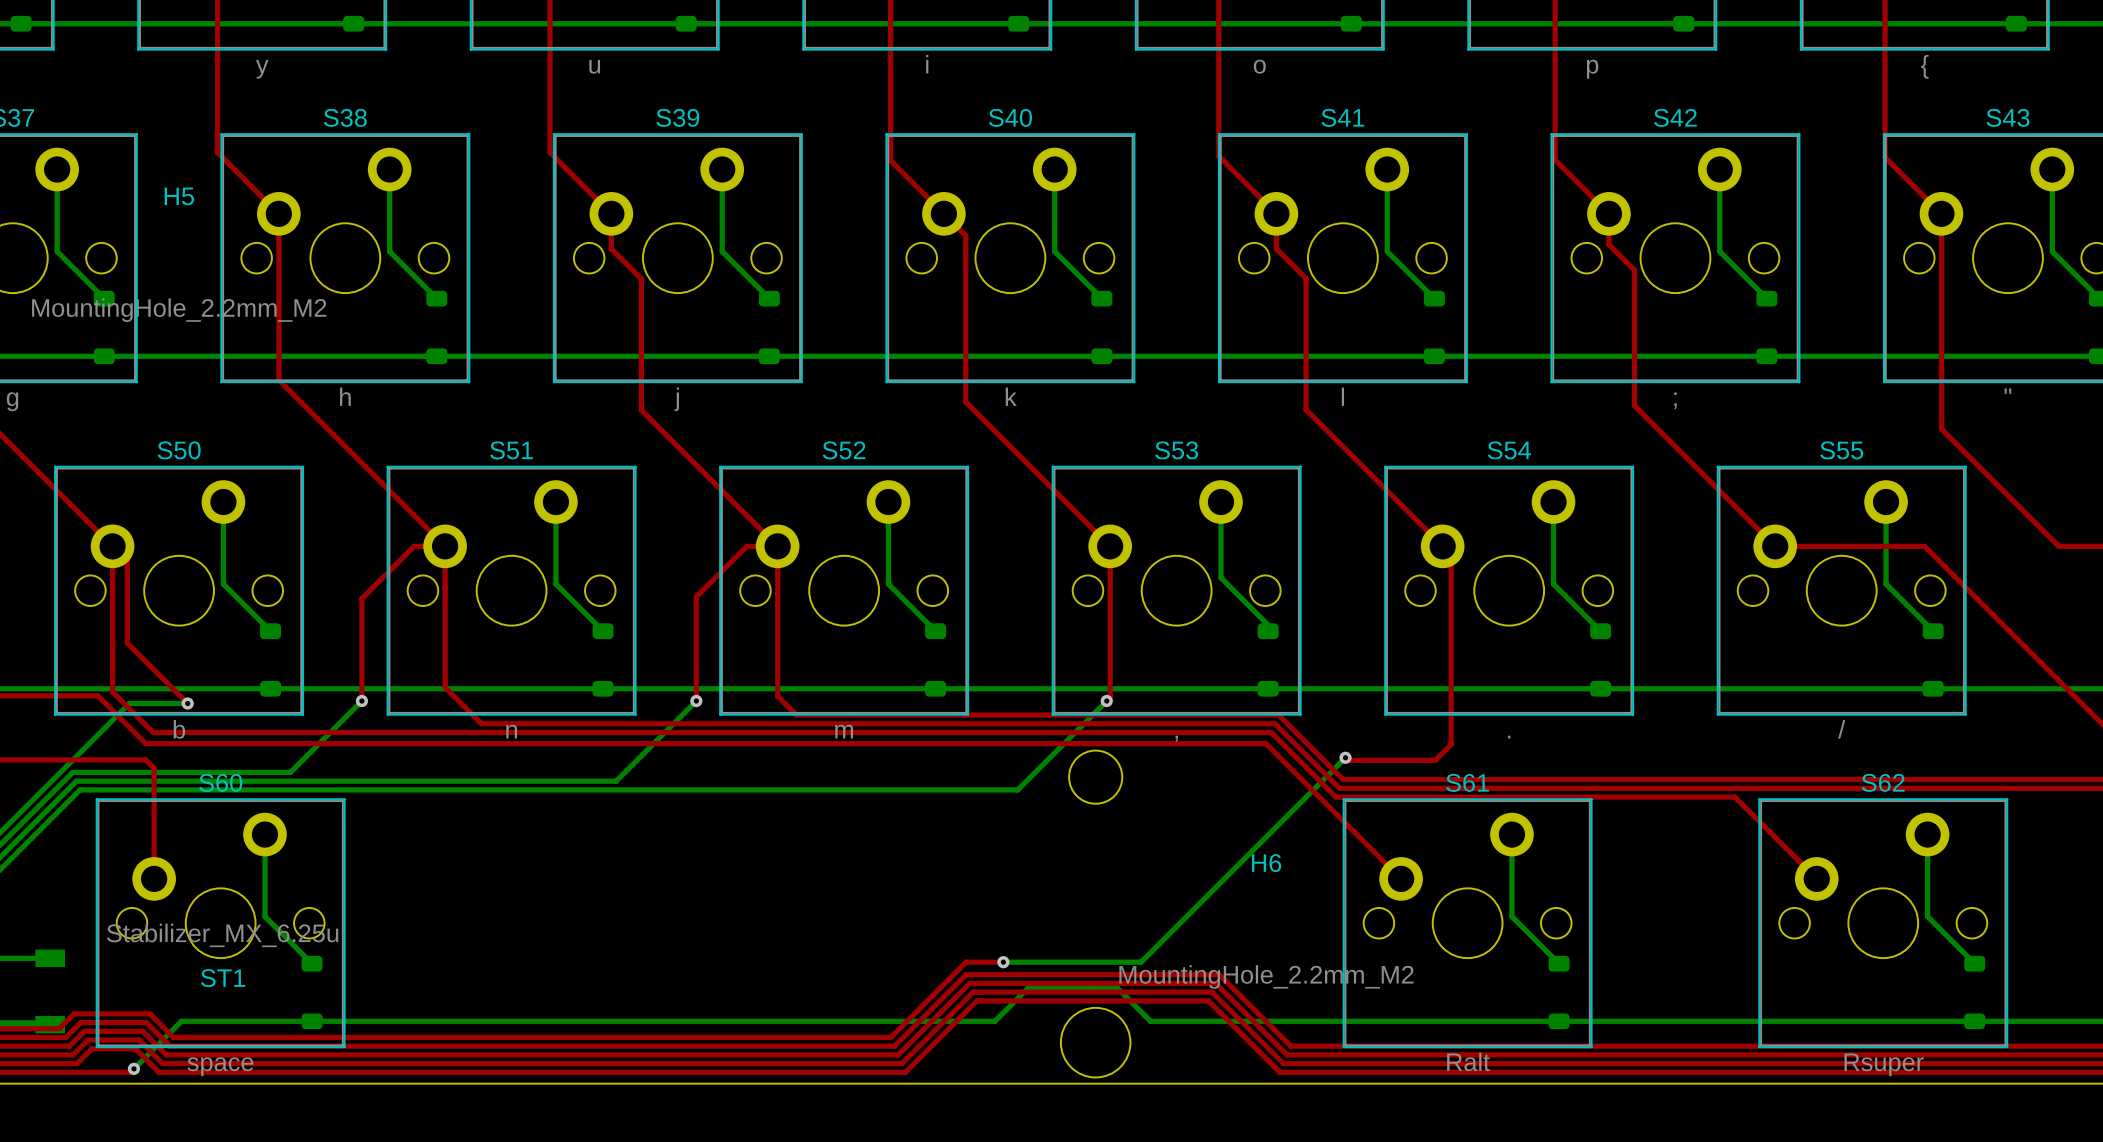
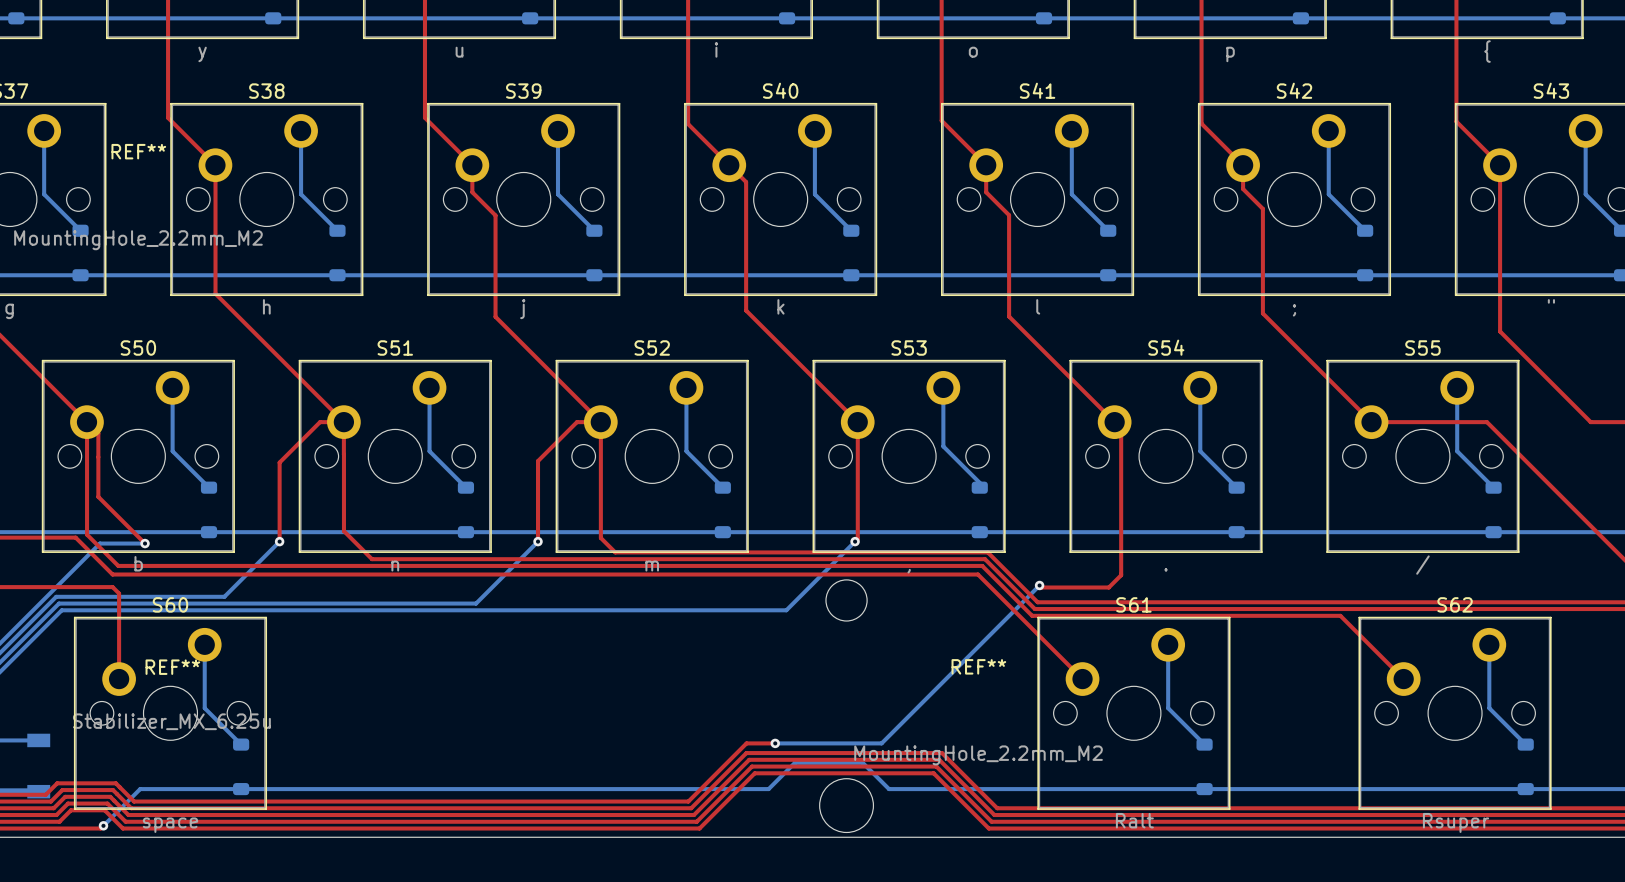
H5 name: H5 (179, 196) -> REF** (138, 151)
H6 name: H6 (1266, 863) -> REF** (978, 666)
ST1 name: ST1 (223, 978) -> REF** (172, 667)

